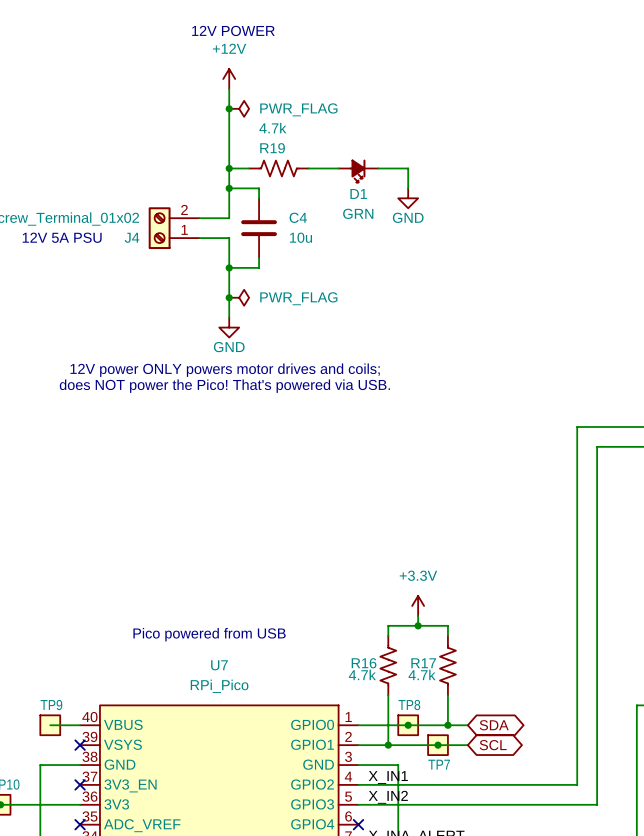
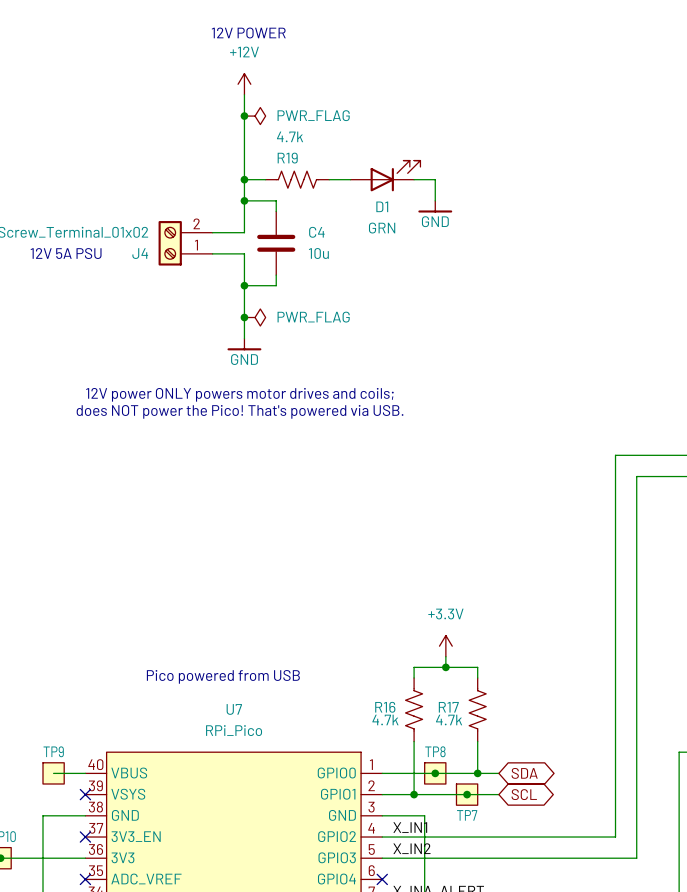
D1 symbol: [338, 159, 379, 183] -> [350, 160, 421, 192]
power symbol shape: [398, 188, 419, 209] -> [418, 200, 453, 213]
power symbol shape: [219, 317, 240, 338] -> [227, 338, 262, 351]

